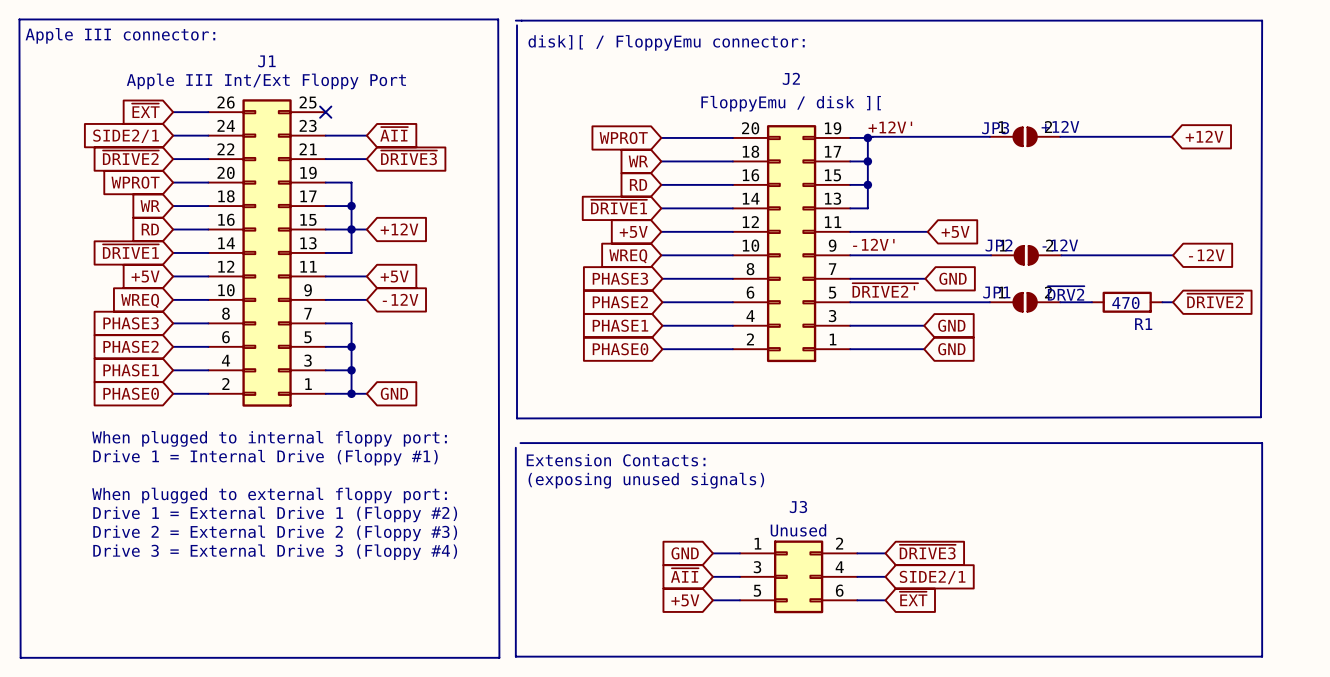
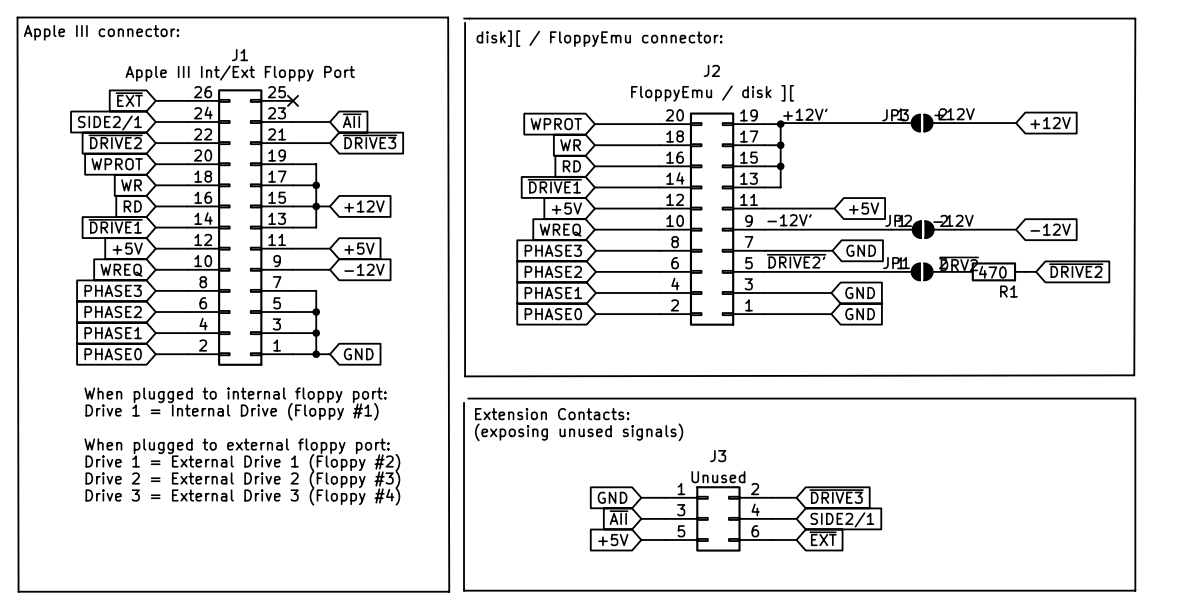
wire: (1129, 136) (1171, 136) -> none
global label position: +12V (1204, 136) -> +12V (1050, 123)
wire: (1129, 255) (1172, 255) -> none
global label position: -12V (1206, 255) -> -12V (1050, 229)
global label position: ~{DRIVE2} (1215, 300) -> ~{DRIVE2} (1076, 270)
R1 position: (1127, 302) -> (993, 271)
wire: none -> (1025, 271) (1036, 271)
wire: (1162, 302) (1172, 302) -> none

